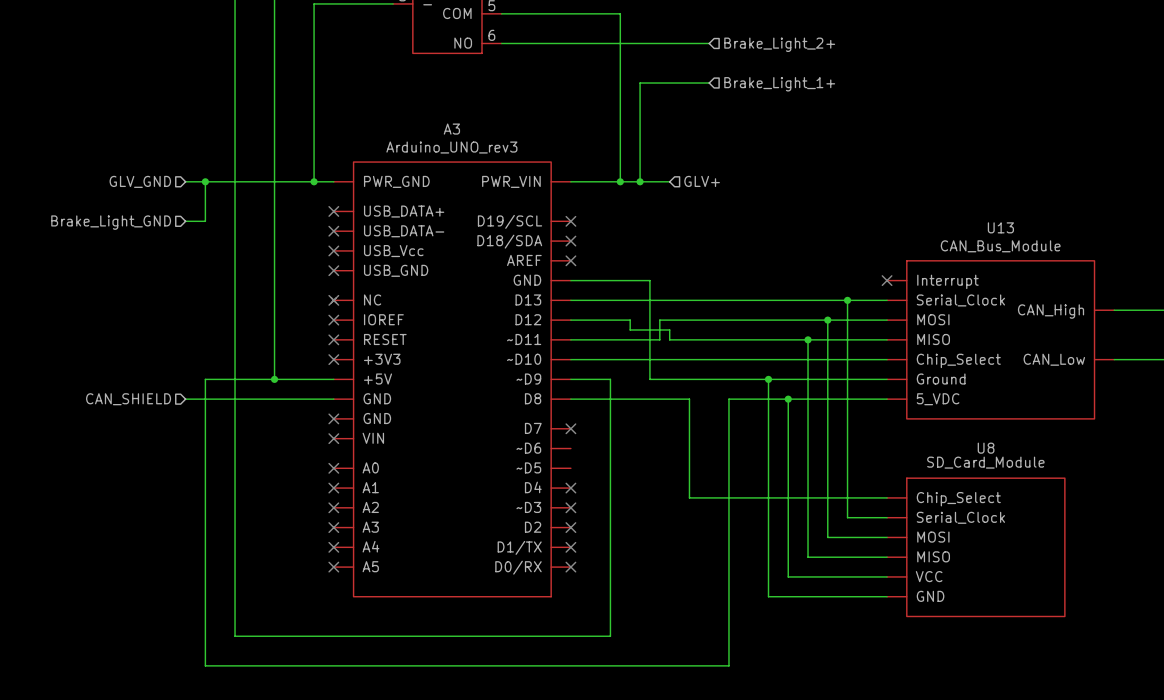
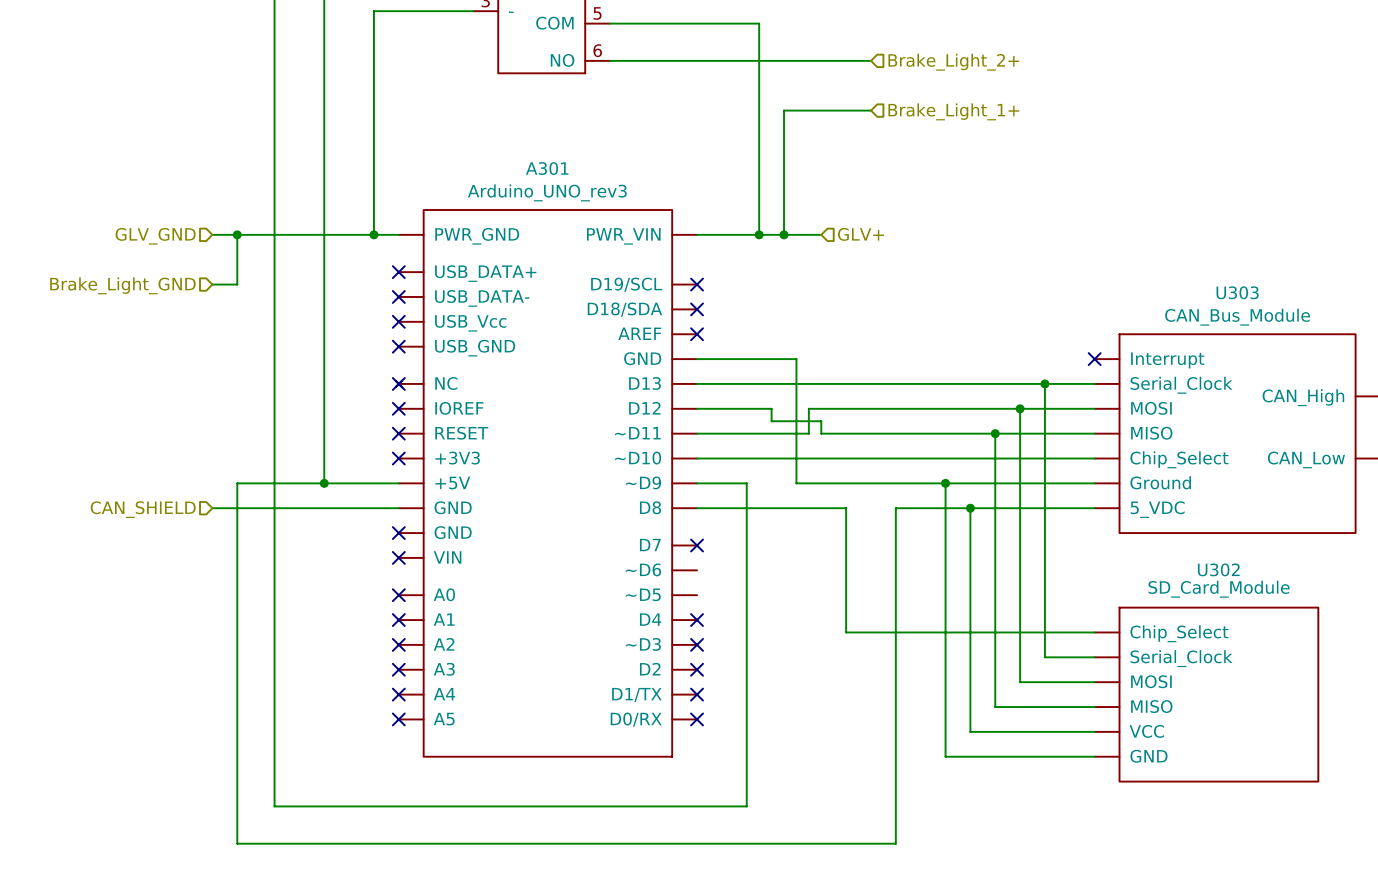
A3 name: A3 (451, 129) -> A301 (547, 168)
U13 name: U13 (1000, 227) -> U303 (1237, 292)
U8 name: U8 (986, 448) -> U302 (1218, 569)

